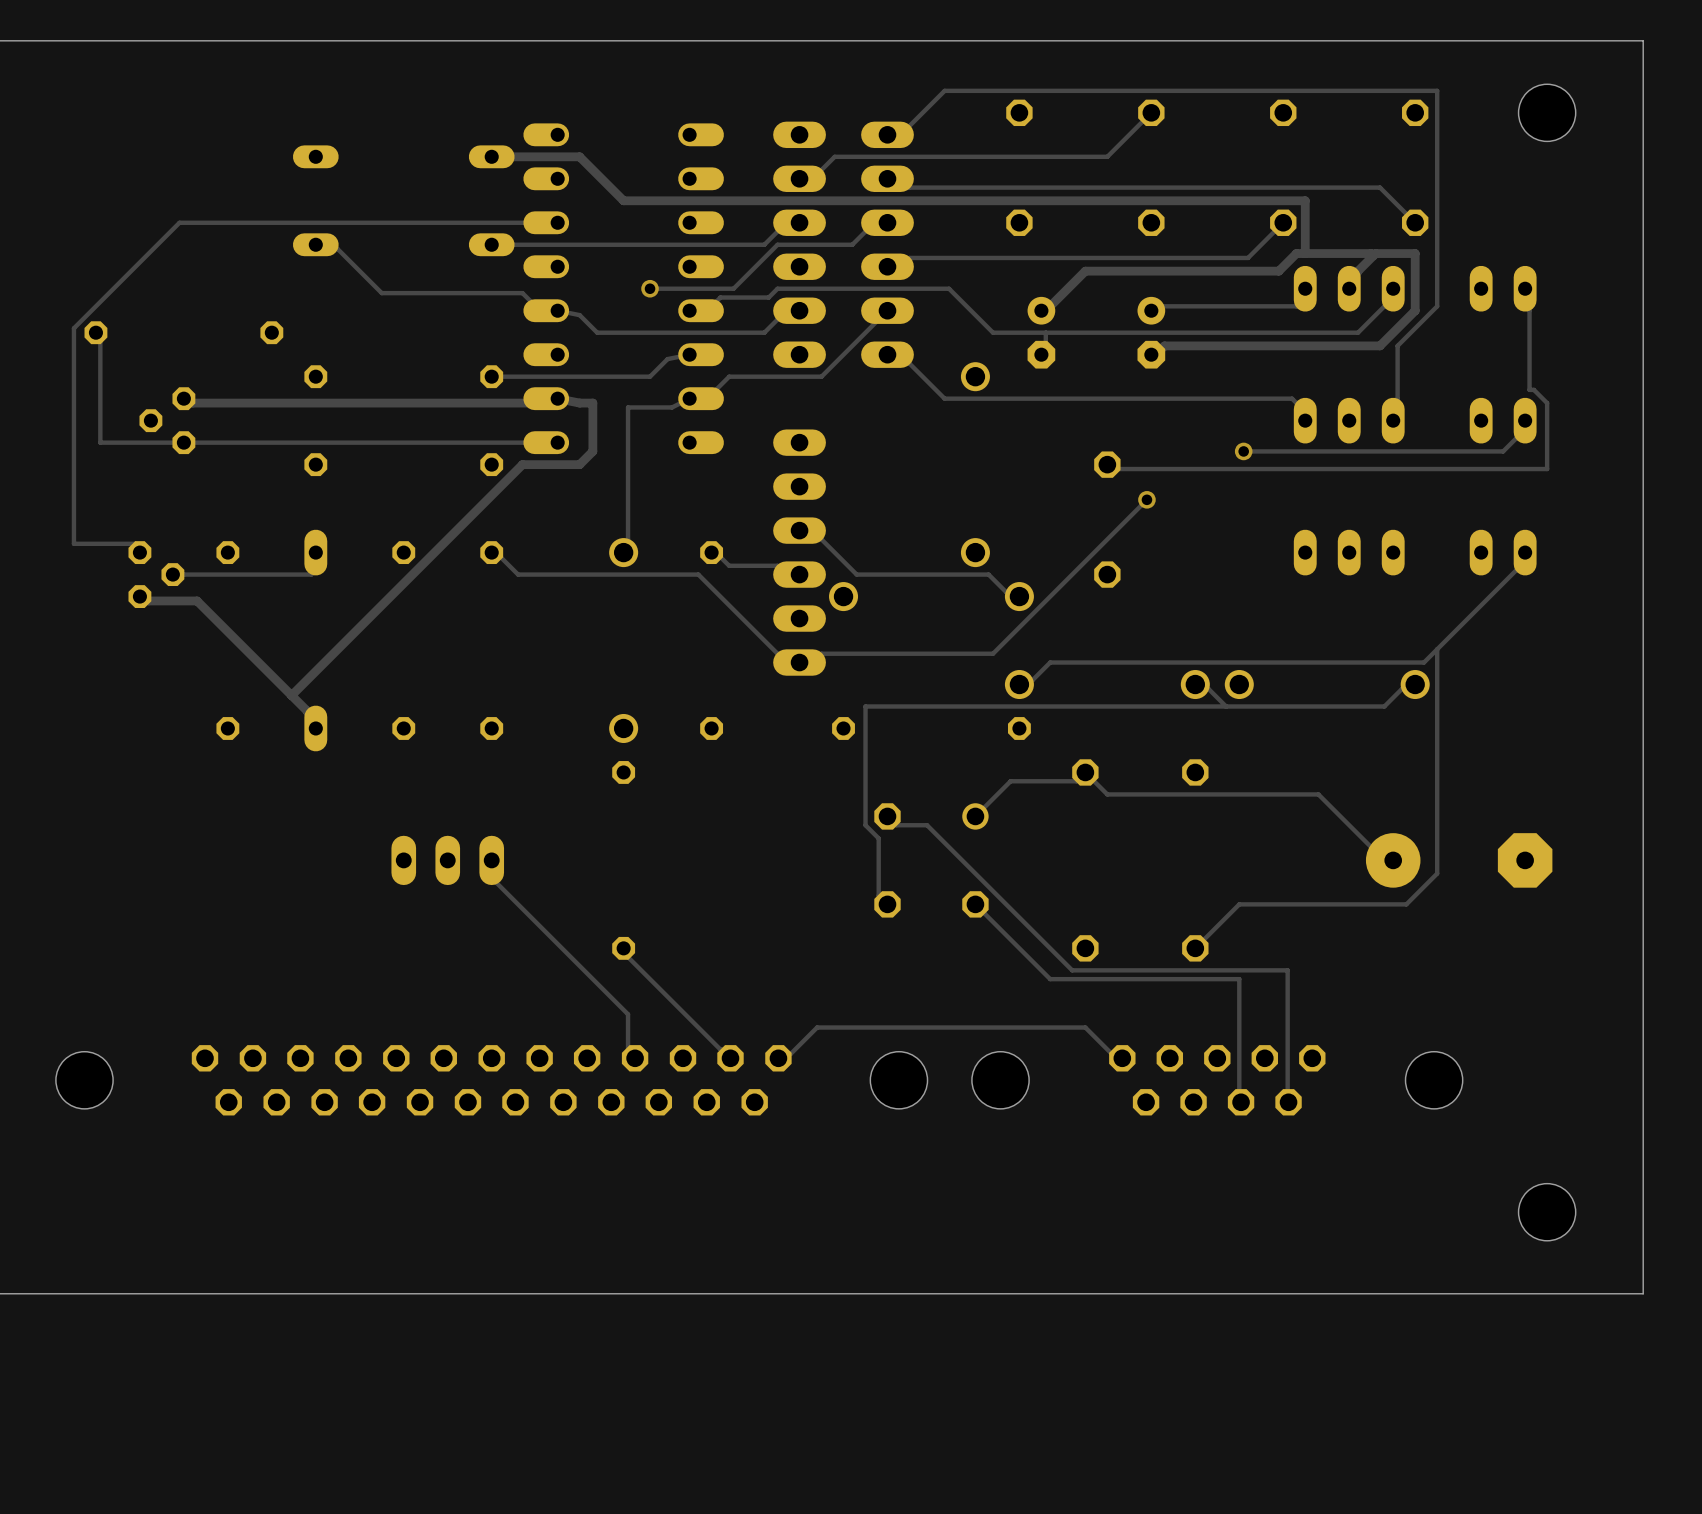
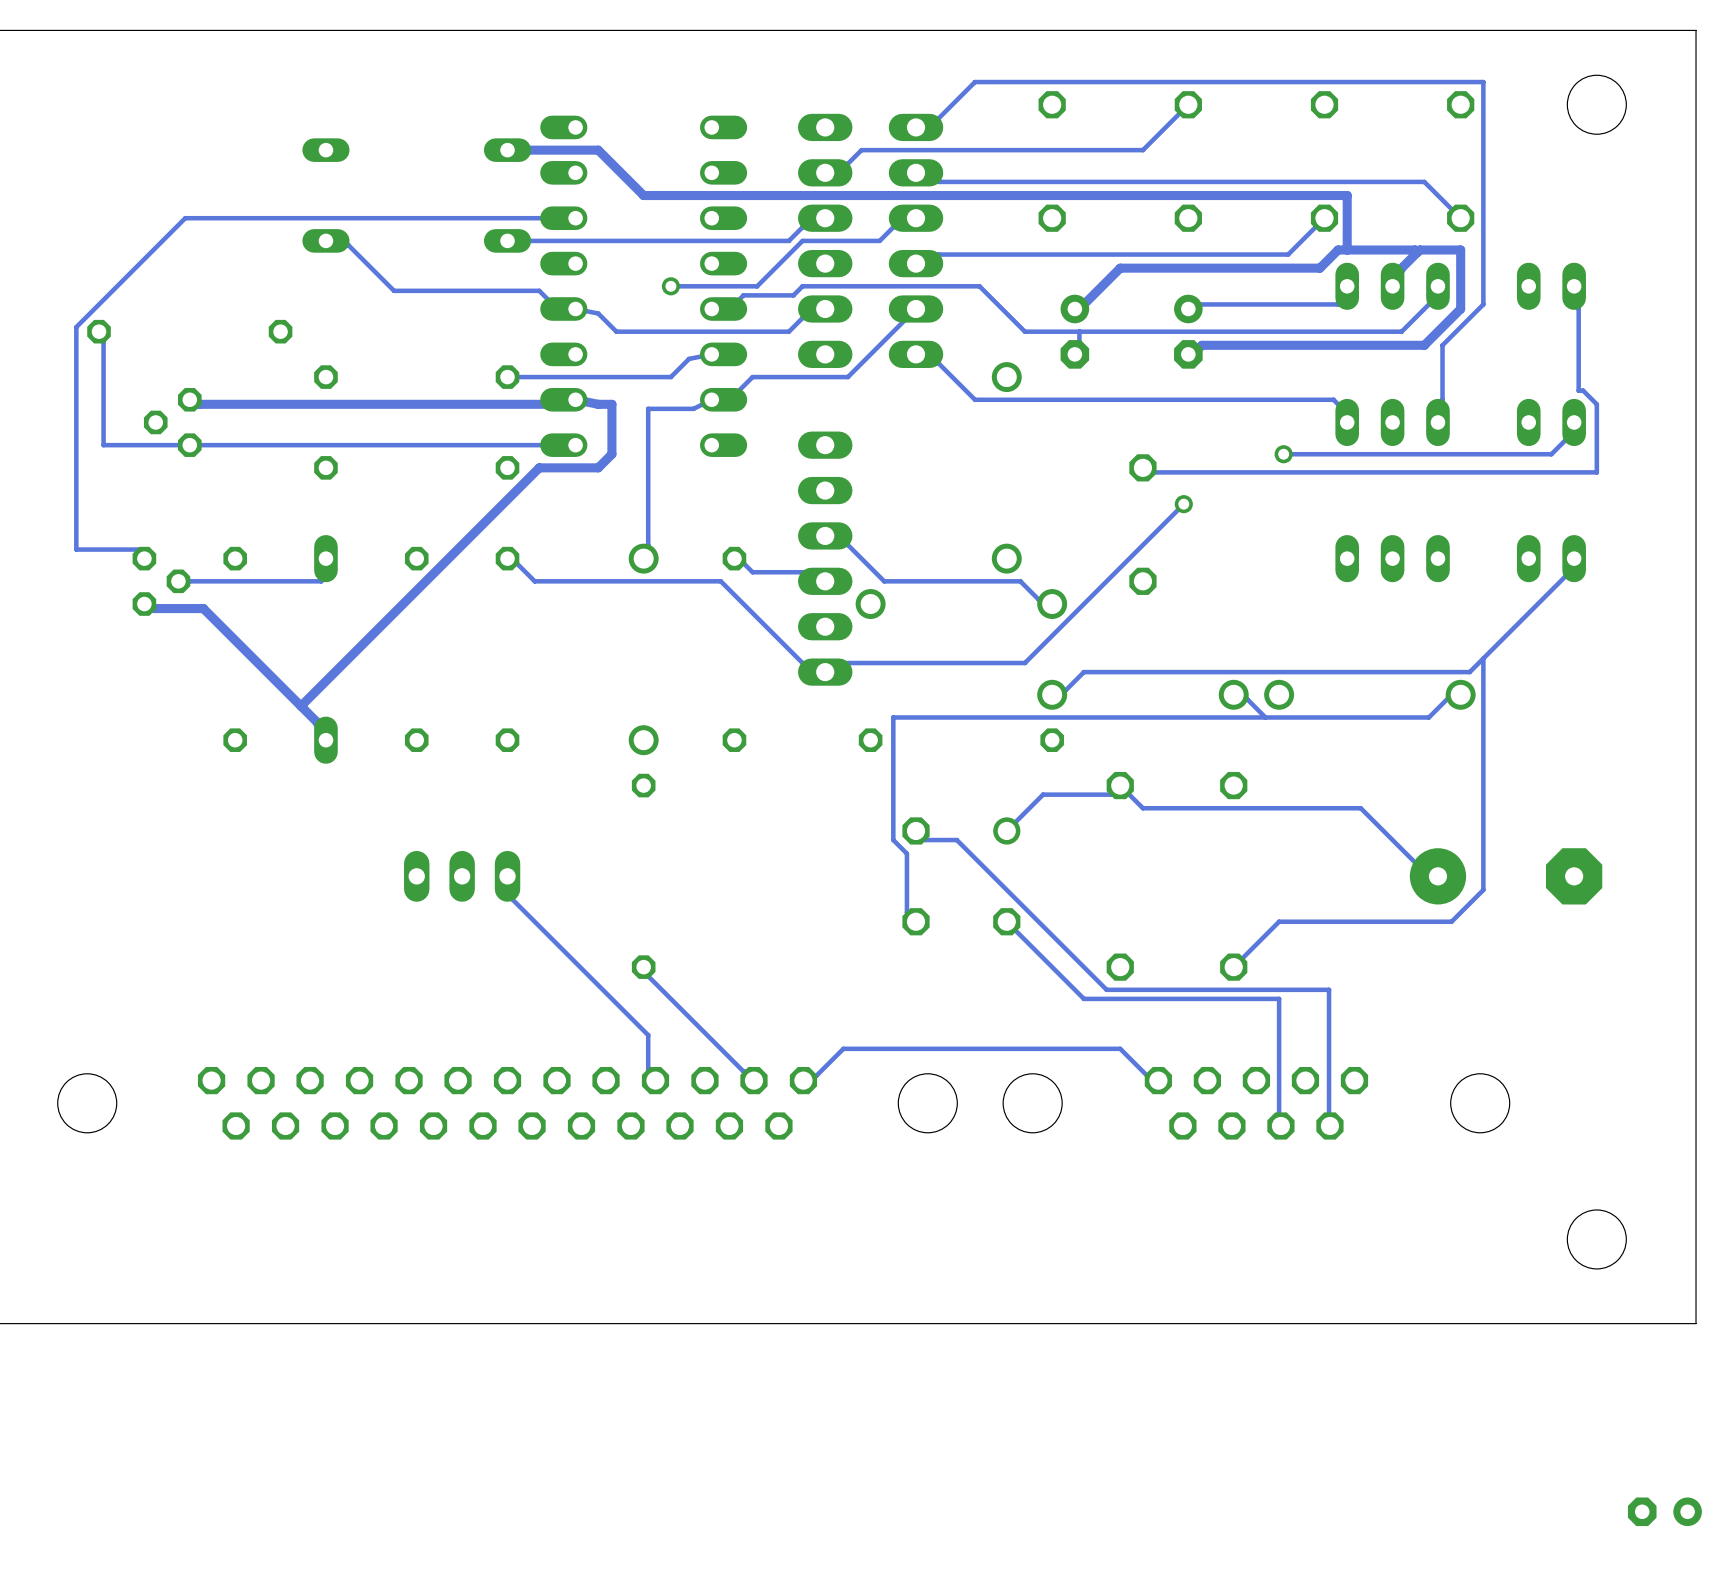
part: none -> (1664, 1511)

